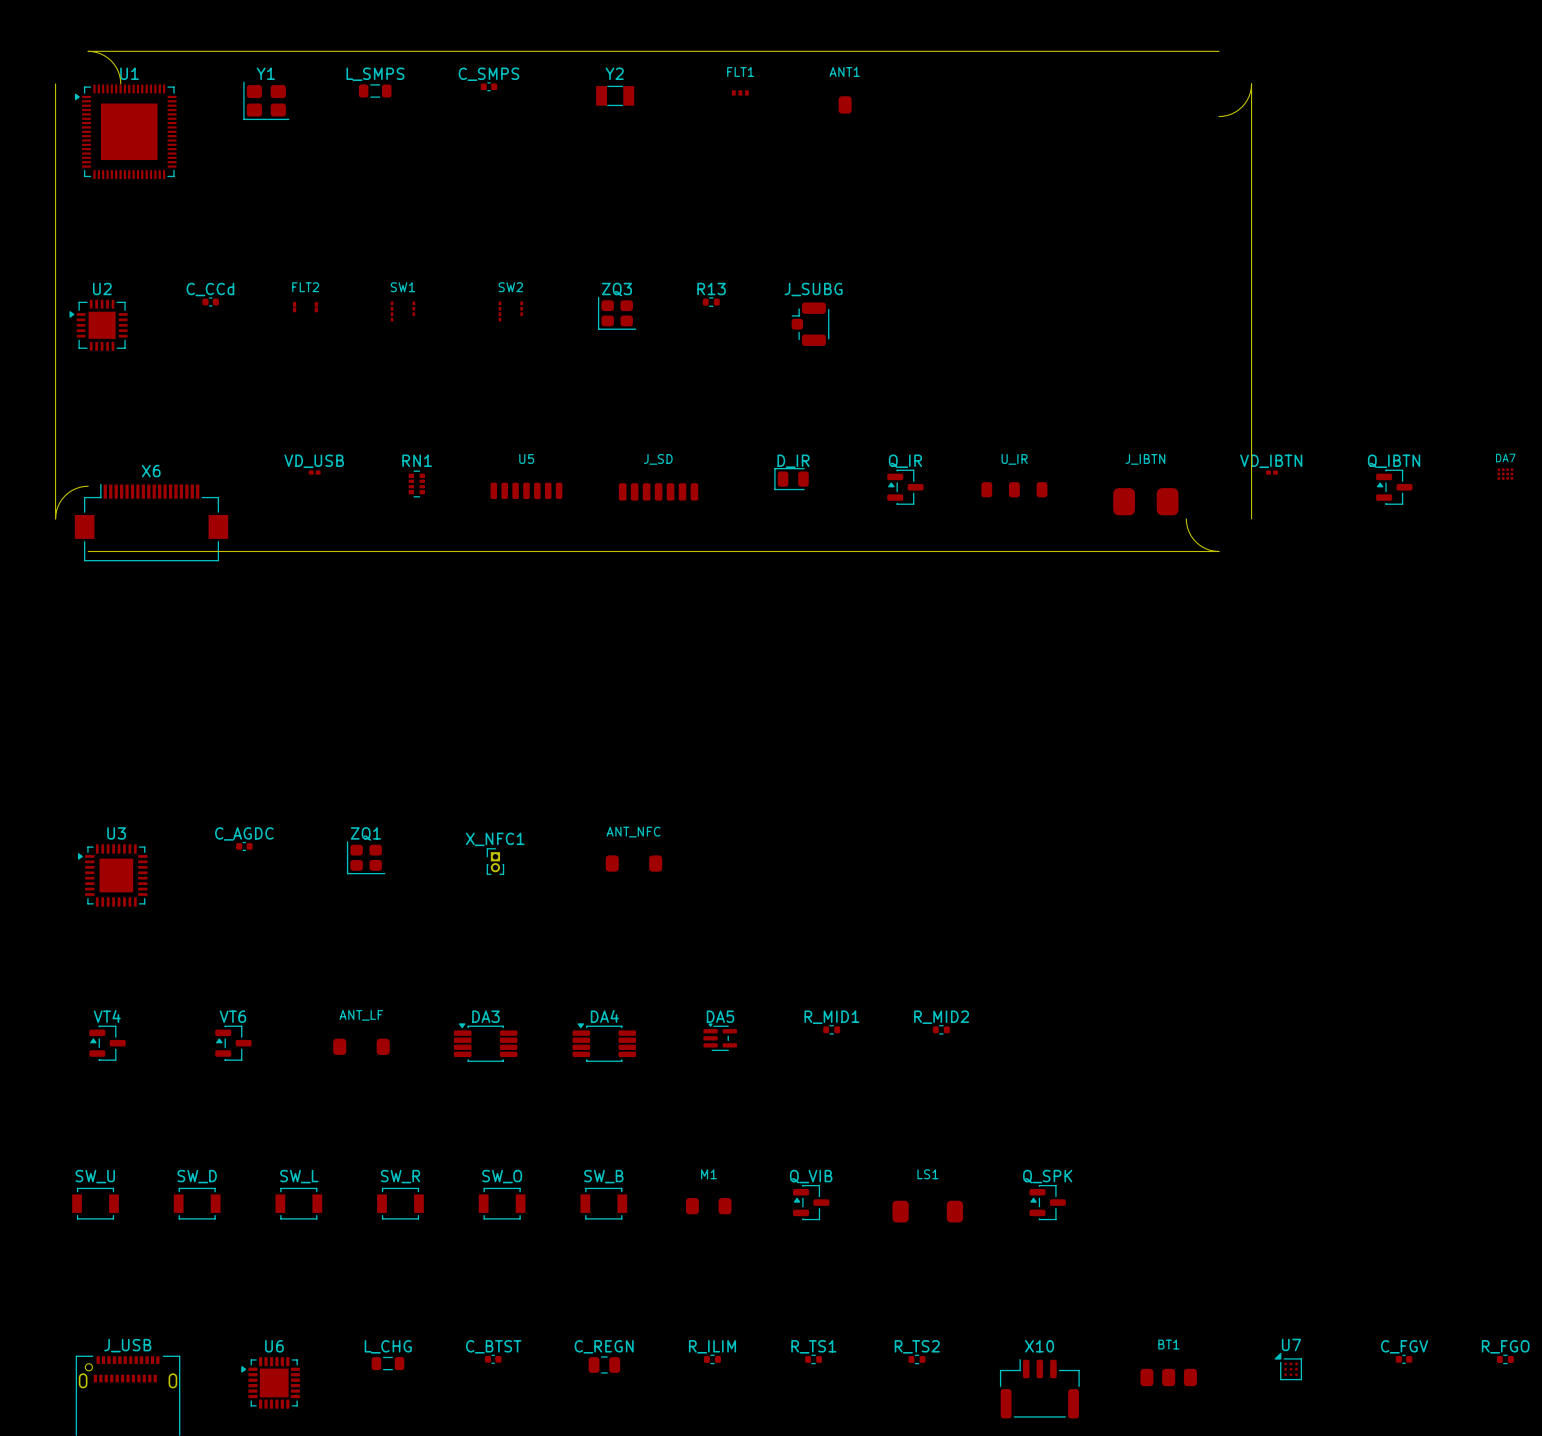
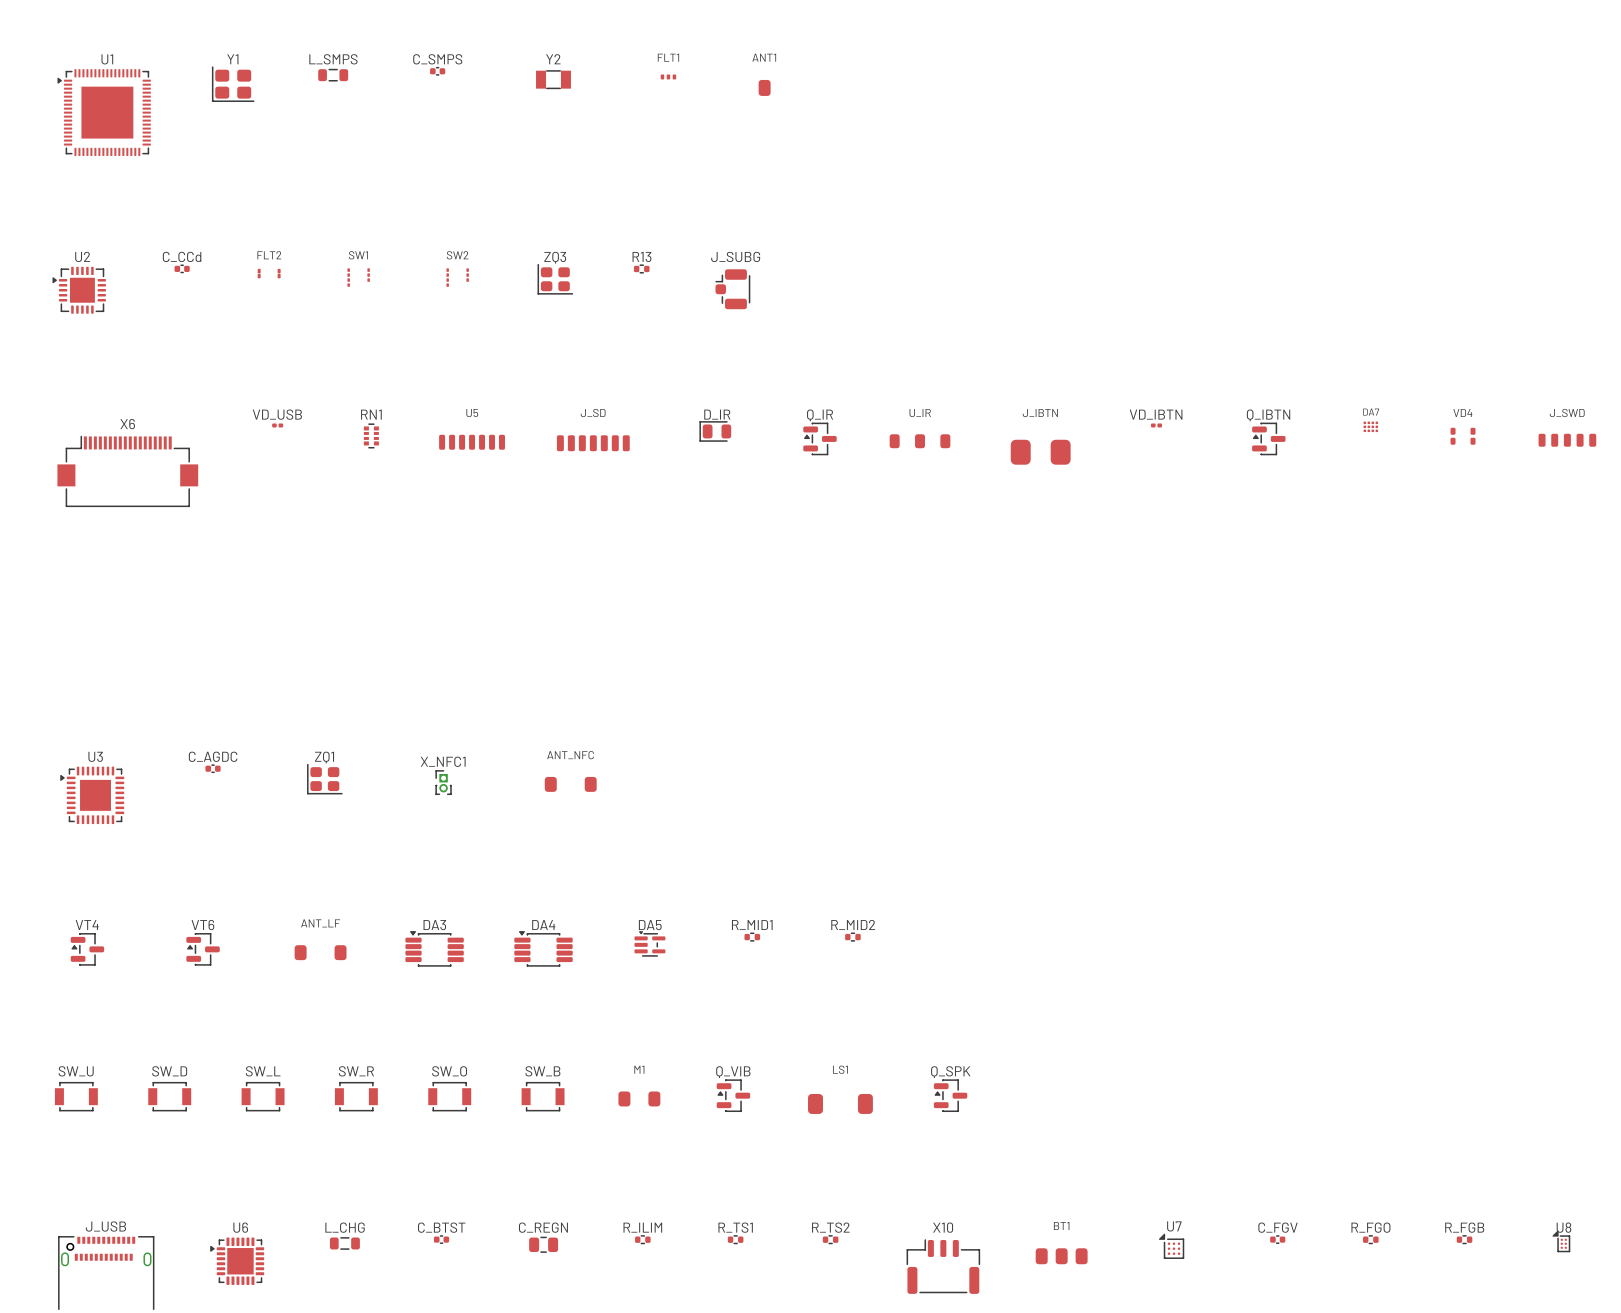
board edge: (1218, 51) (88, 51) (100, 53) (111, 60) (118, 71) (120, 83) -> none
board edge: (55, 83) (55, 518) (58, 506) (65, 495) (75, 488) (88, 486) -> none
board edge: (1218, 116) (1231, 114) (1242, 107) (1249, 96) (1251, 83) (1251, 518) -> none
board edge: (1186, 518) (1188, 531) (1195, 541) (1206, 549) (1218, 551) (88, 551) -> none

